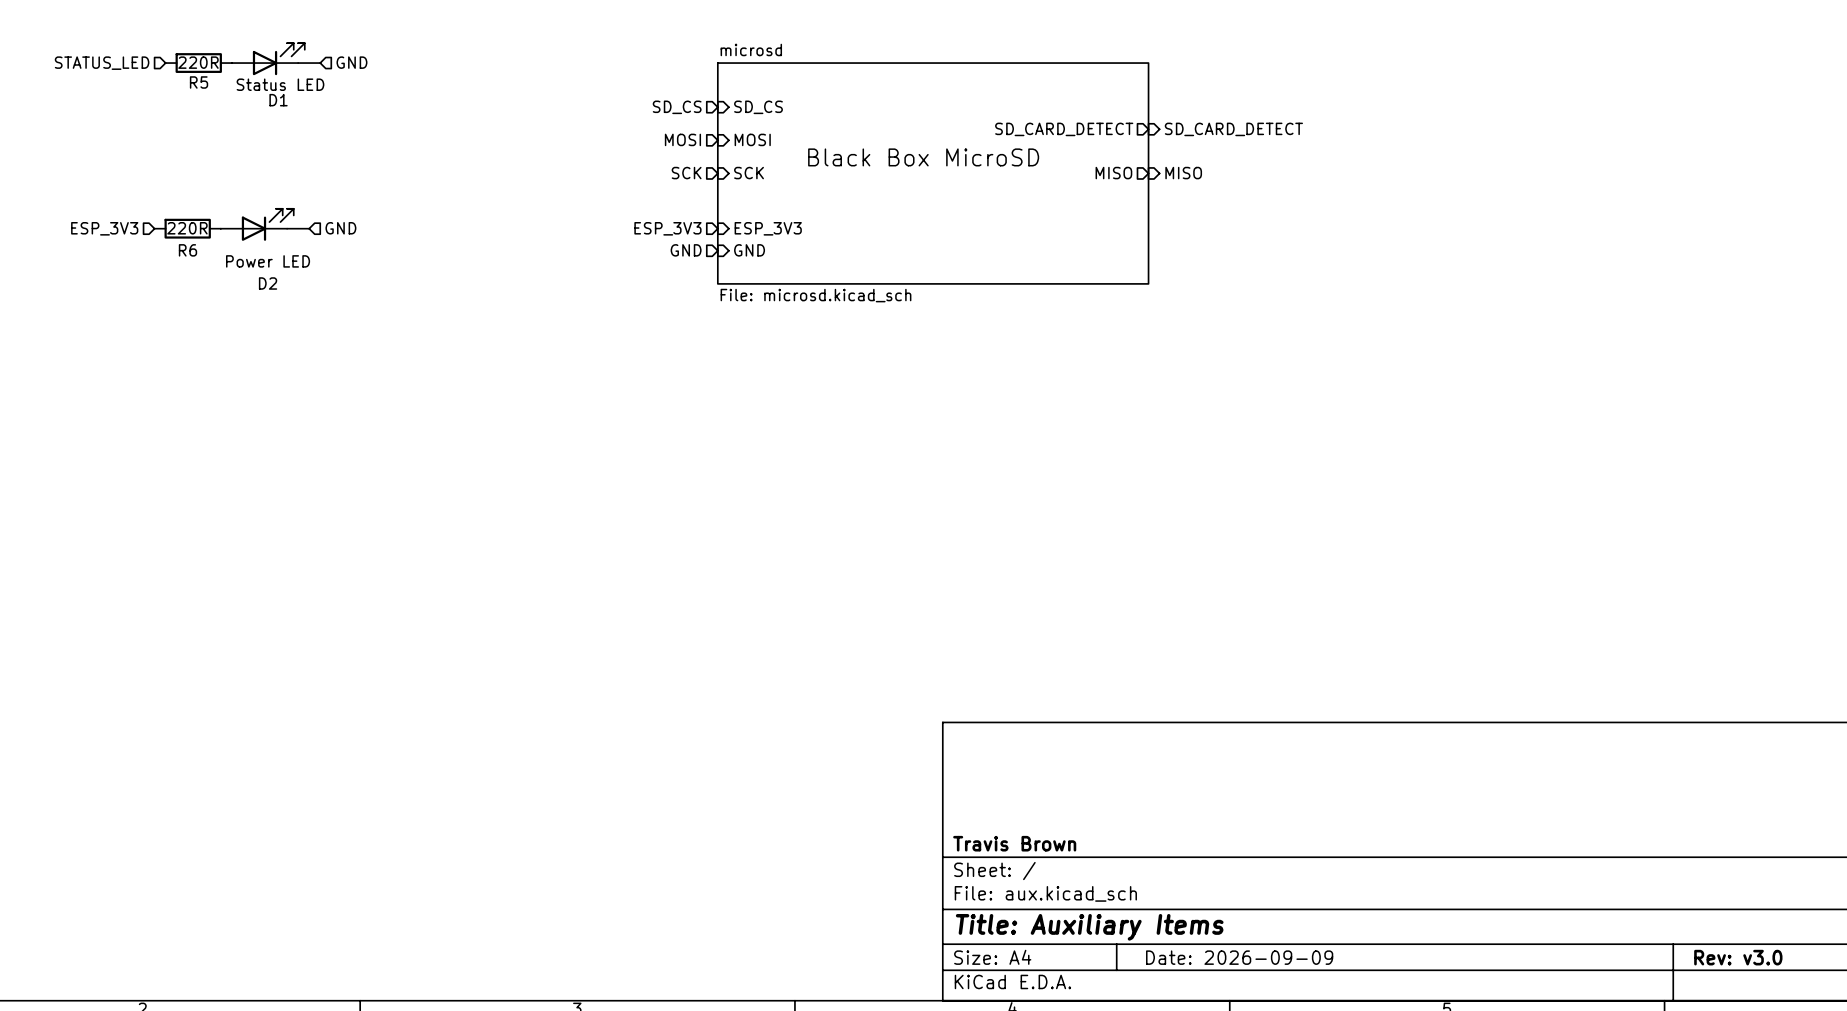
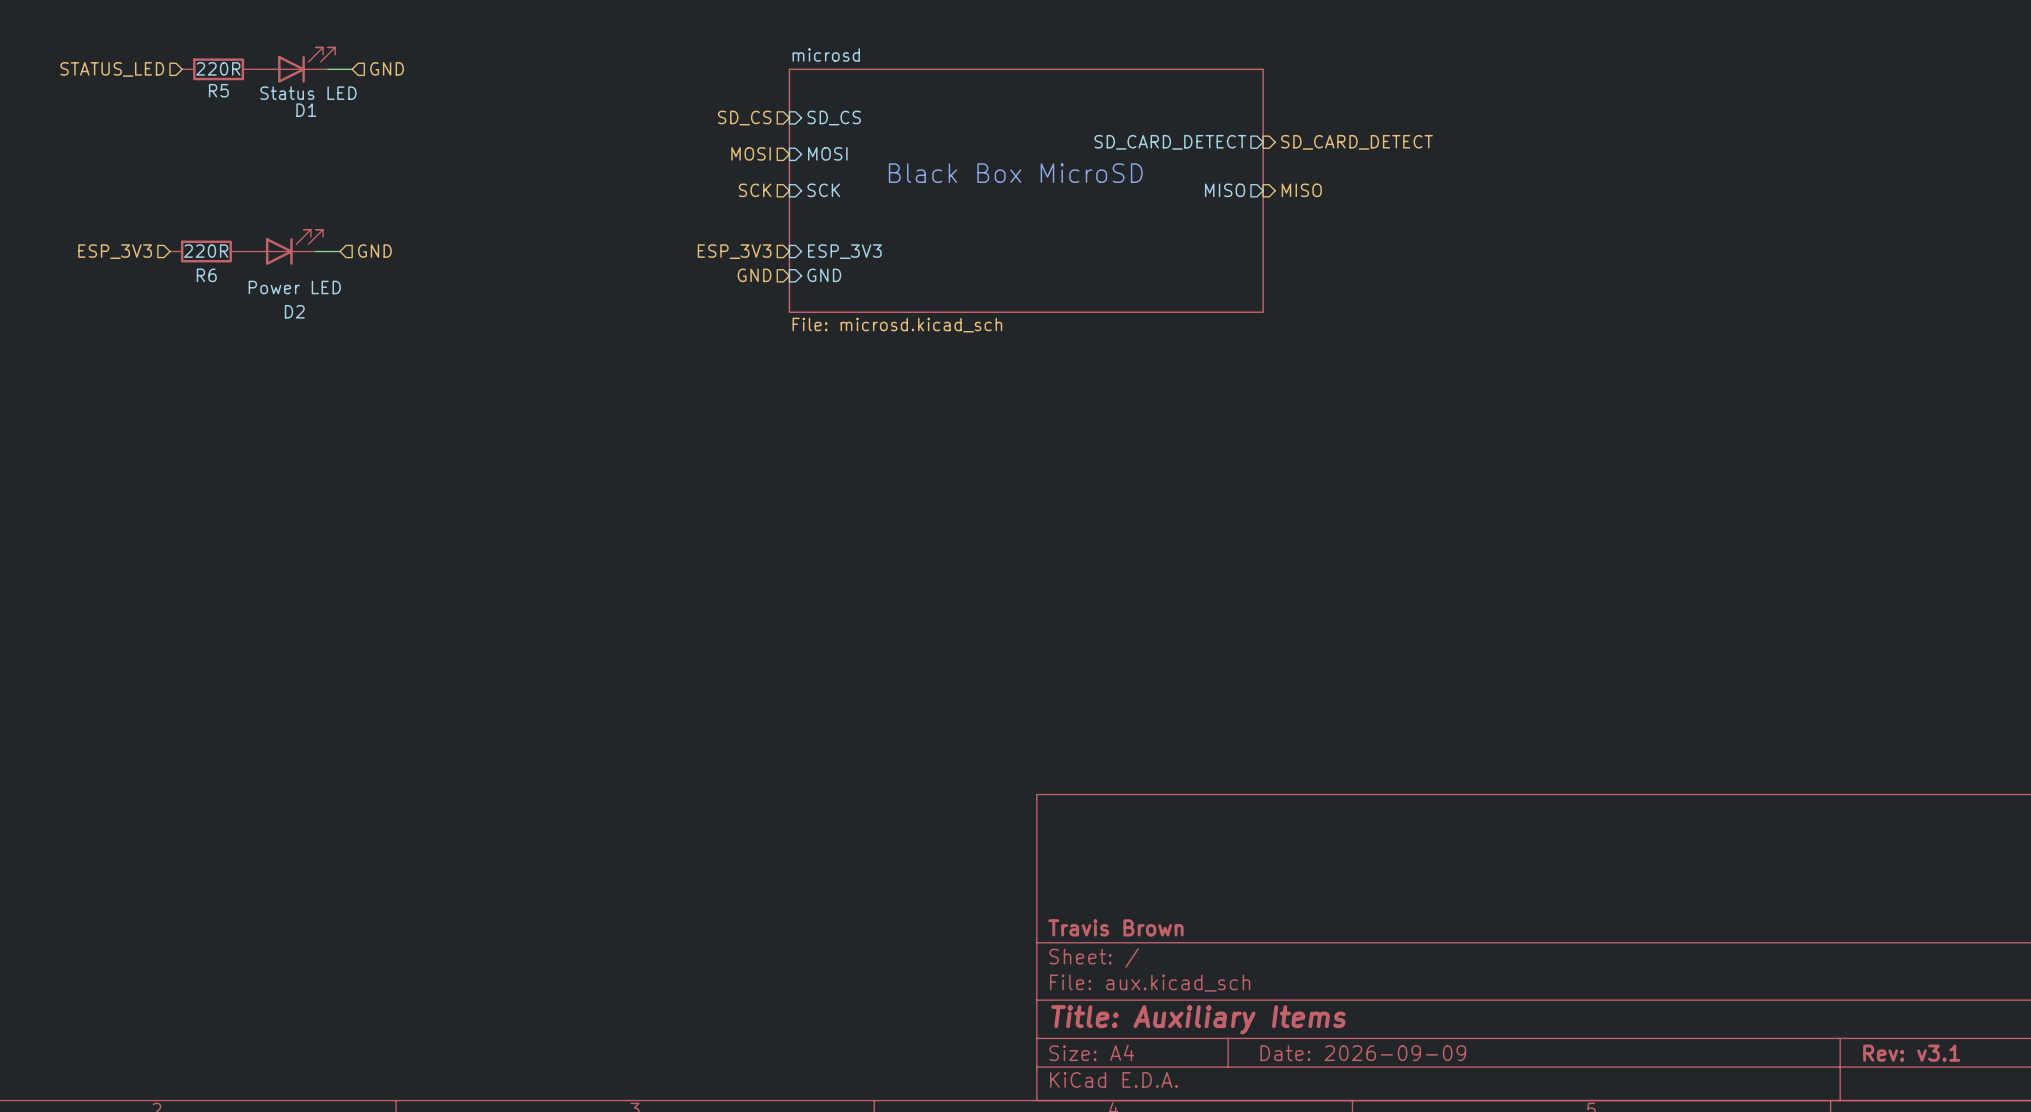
title block: Rev: v3.0 (1738, 957) -> Rev: v3.1 (1911, 1053)

